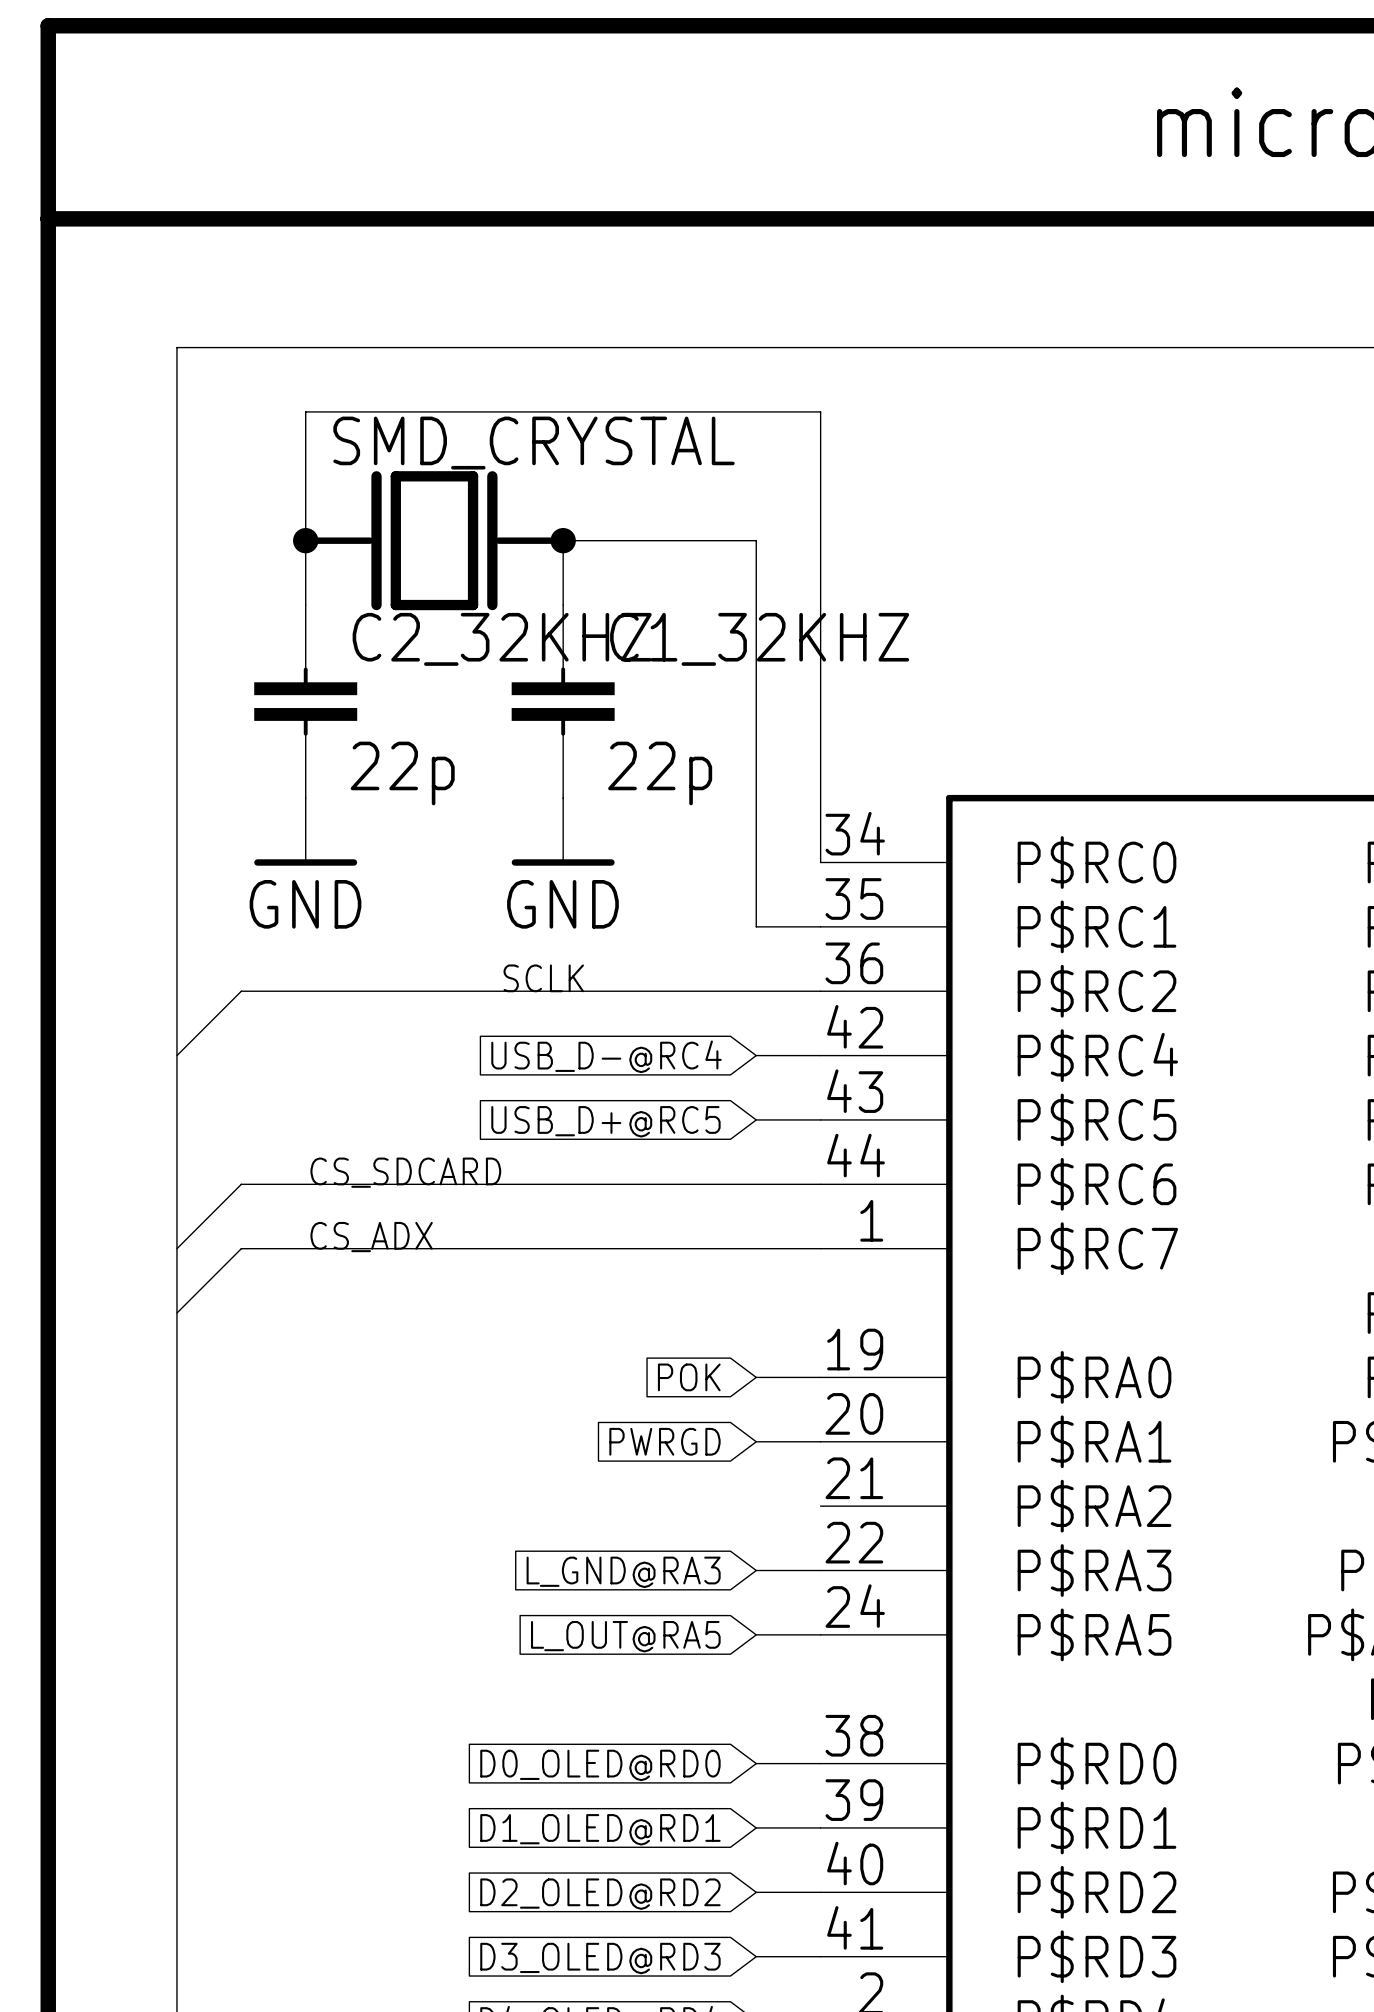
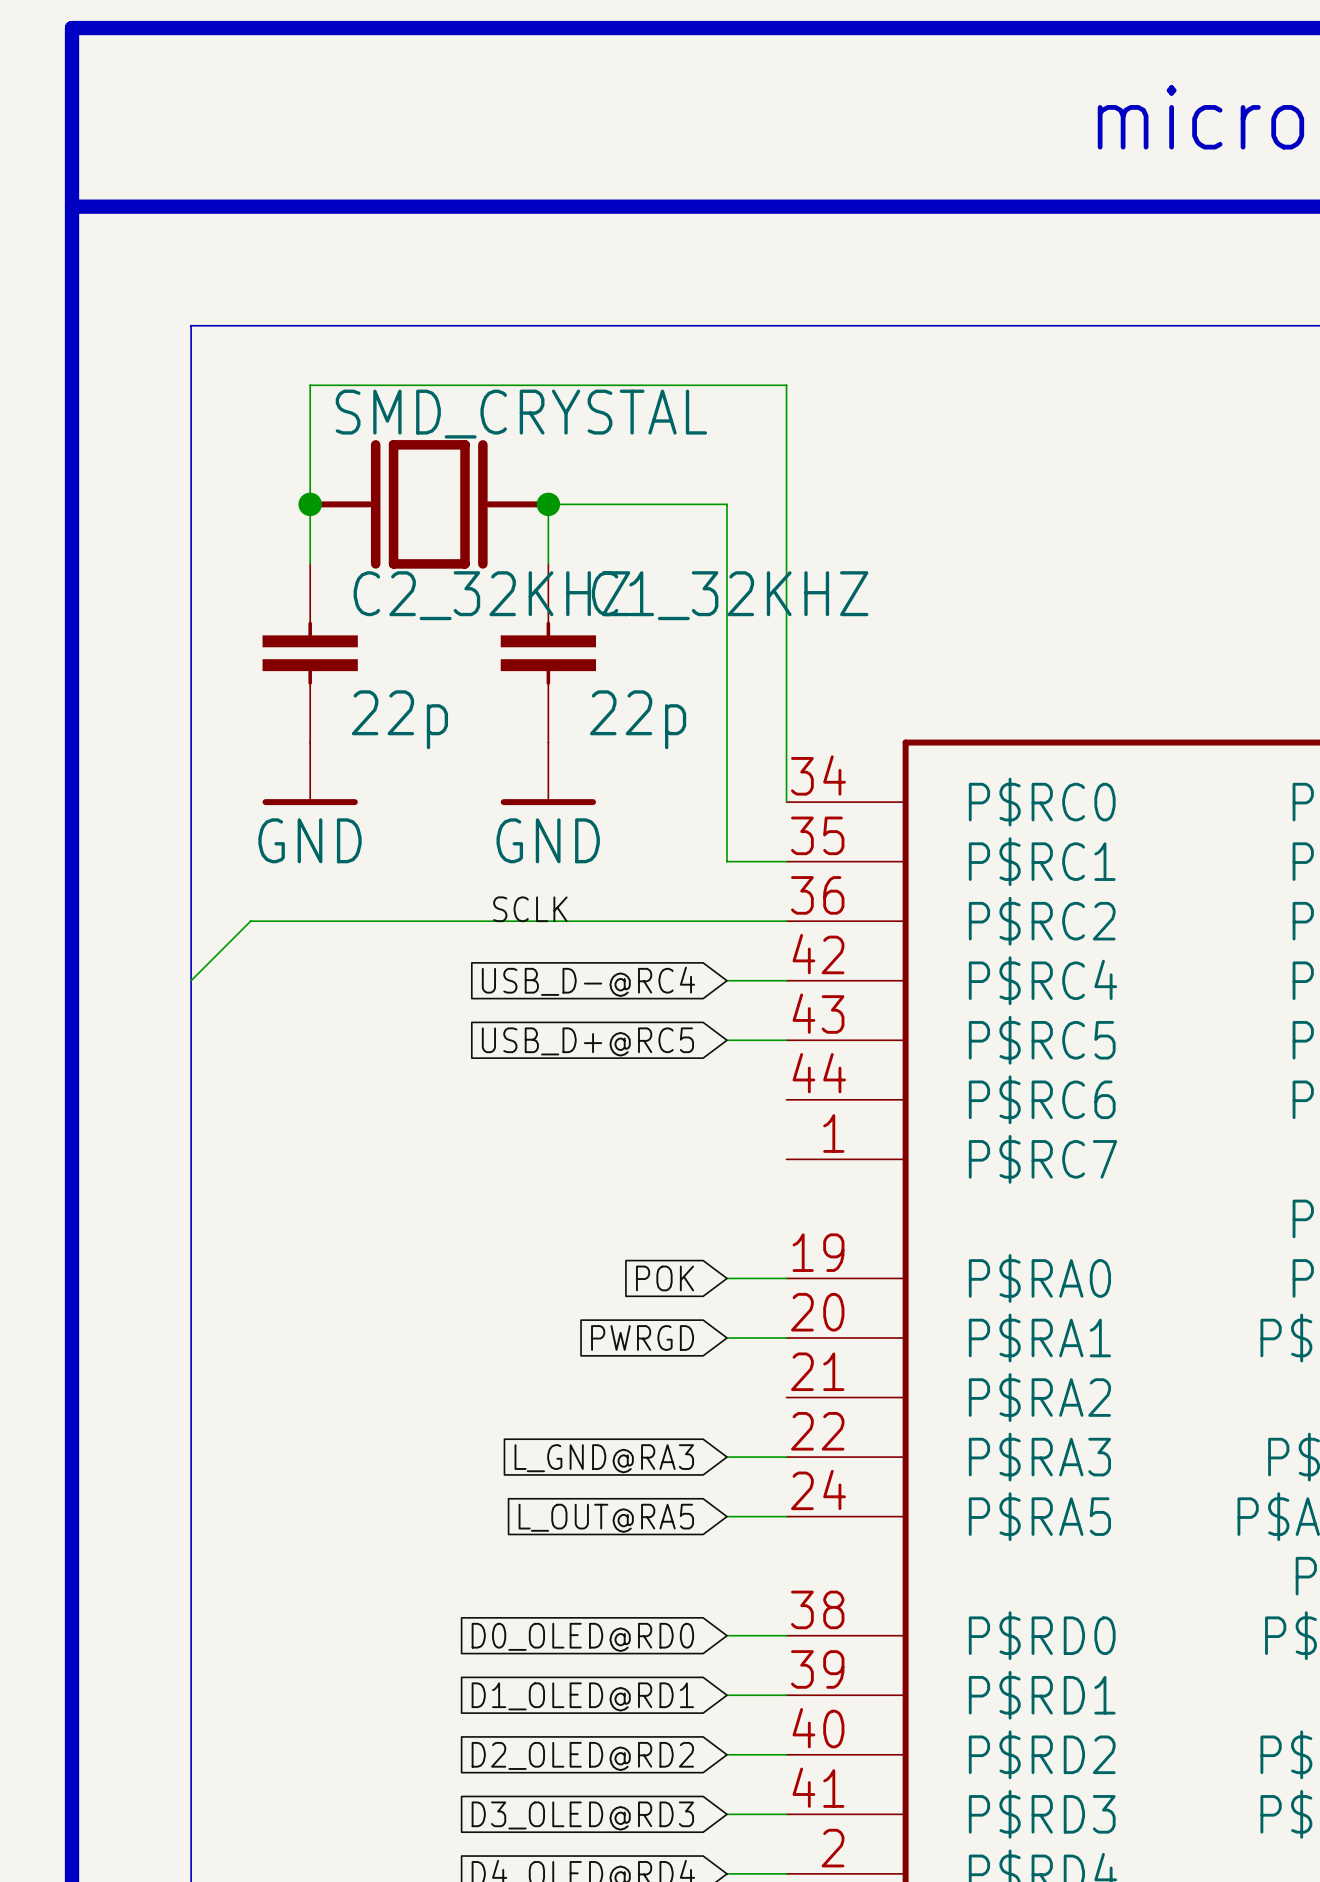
label: CS_SDCARD (405, 1172) -> none
wire: (820, 1184) (241, 1184) (176, 1248) -> none
label: CS_ADX (371, 1237) -> none
wire: (820, 1248) (241, 1248) (176, 1313) -> none

